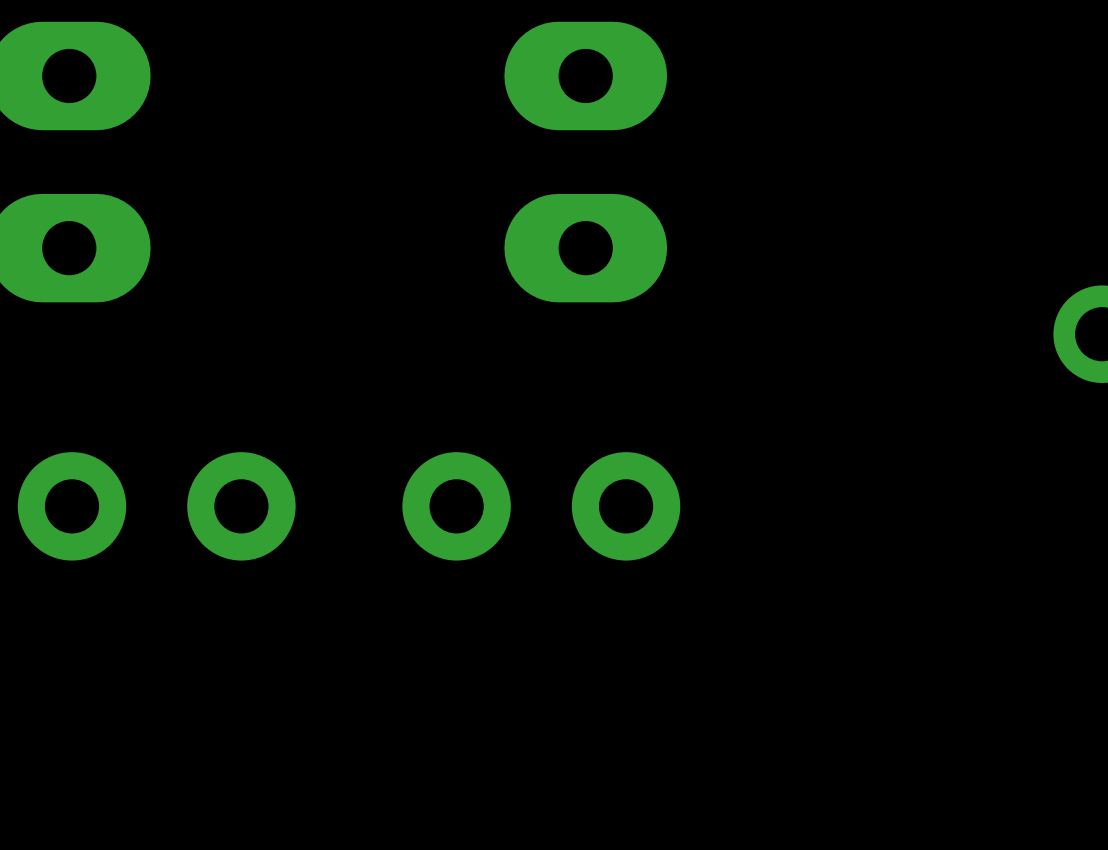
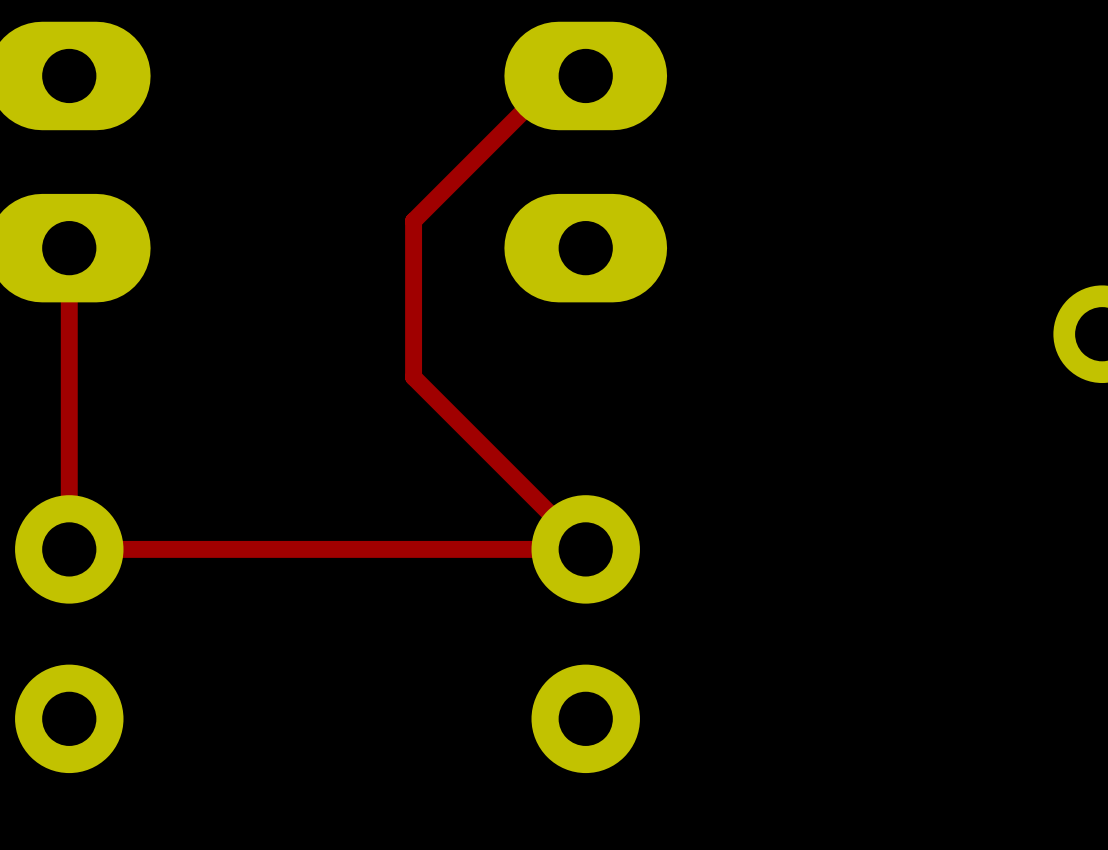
top track: none -> (585, 75) (558, 75) (413, 221) (413, 377) (585, 549) (69, 549) (69, 248)
part rotation: 0° (156, 506) -> 90° clockwise (69, 634)
part rotation: 0° (541, 506) -> 90° clockwise (585, 634)

